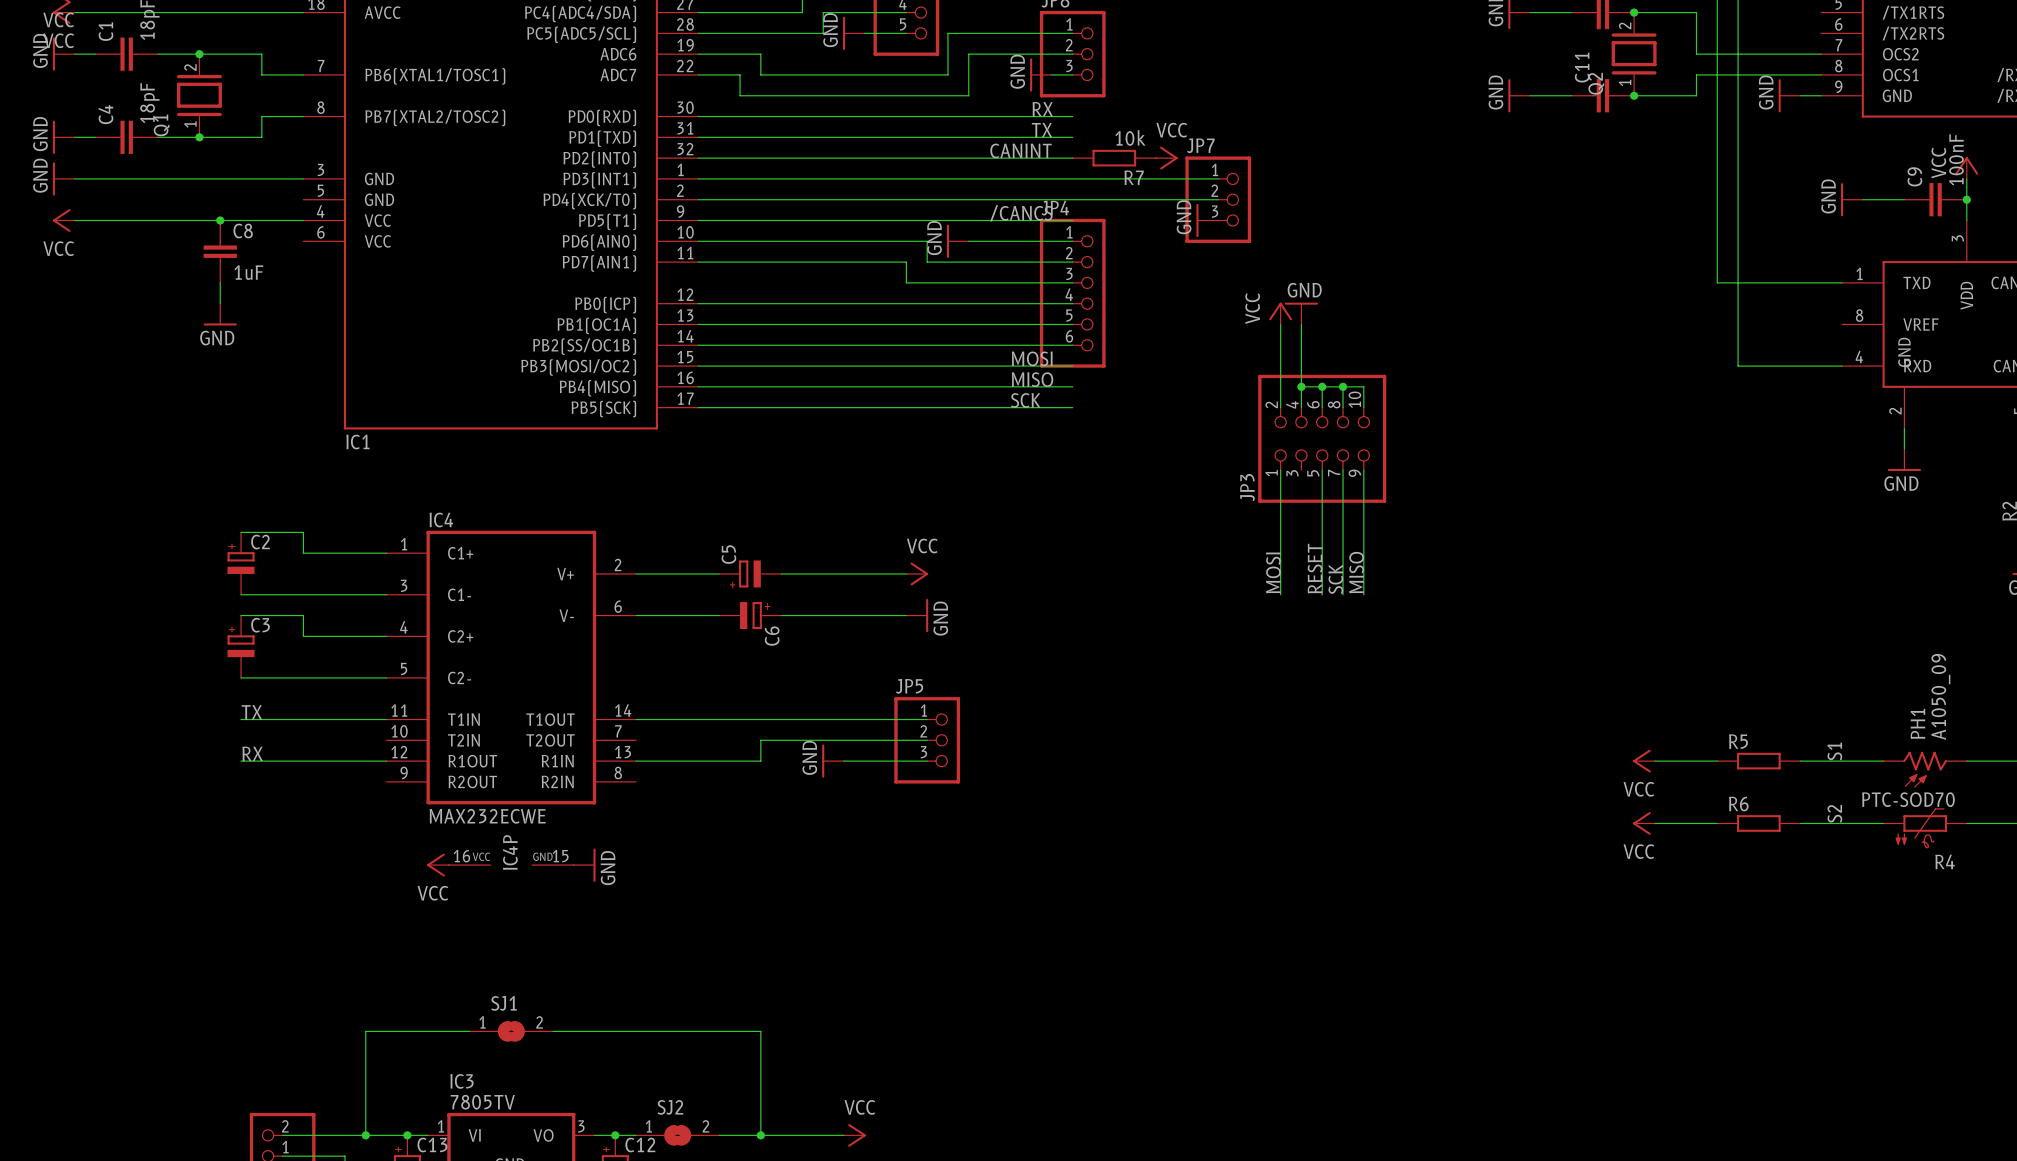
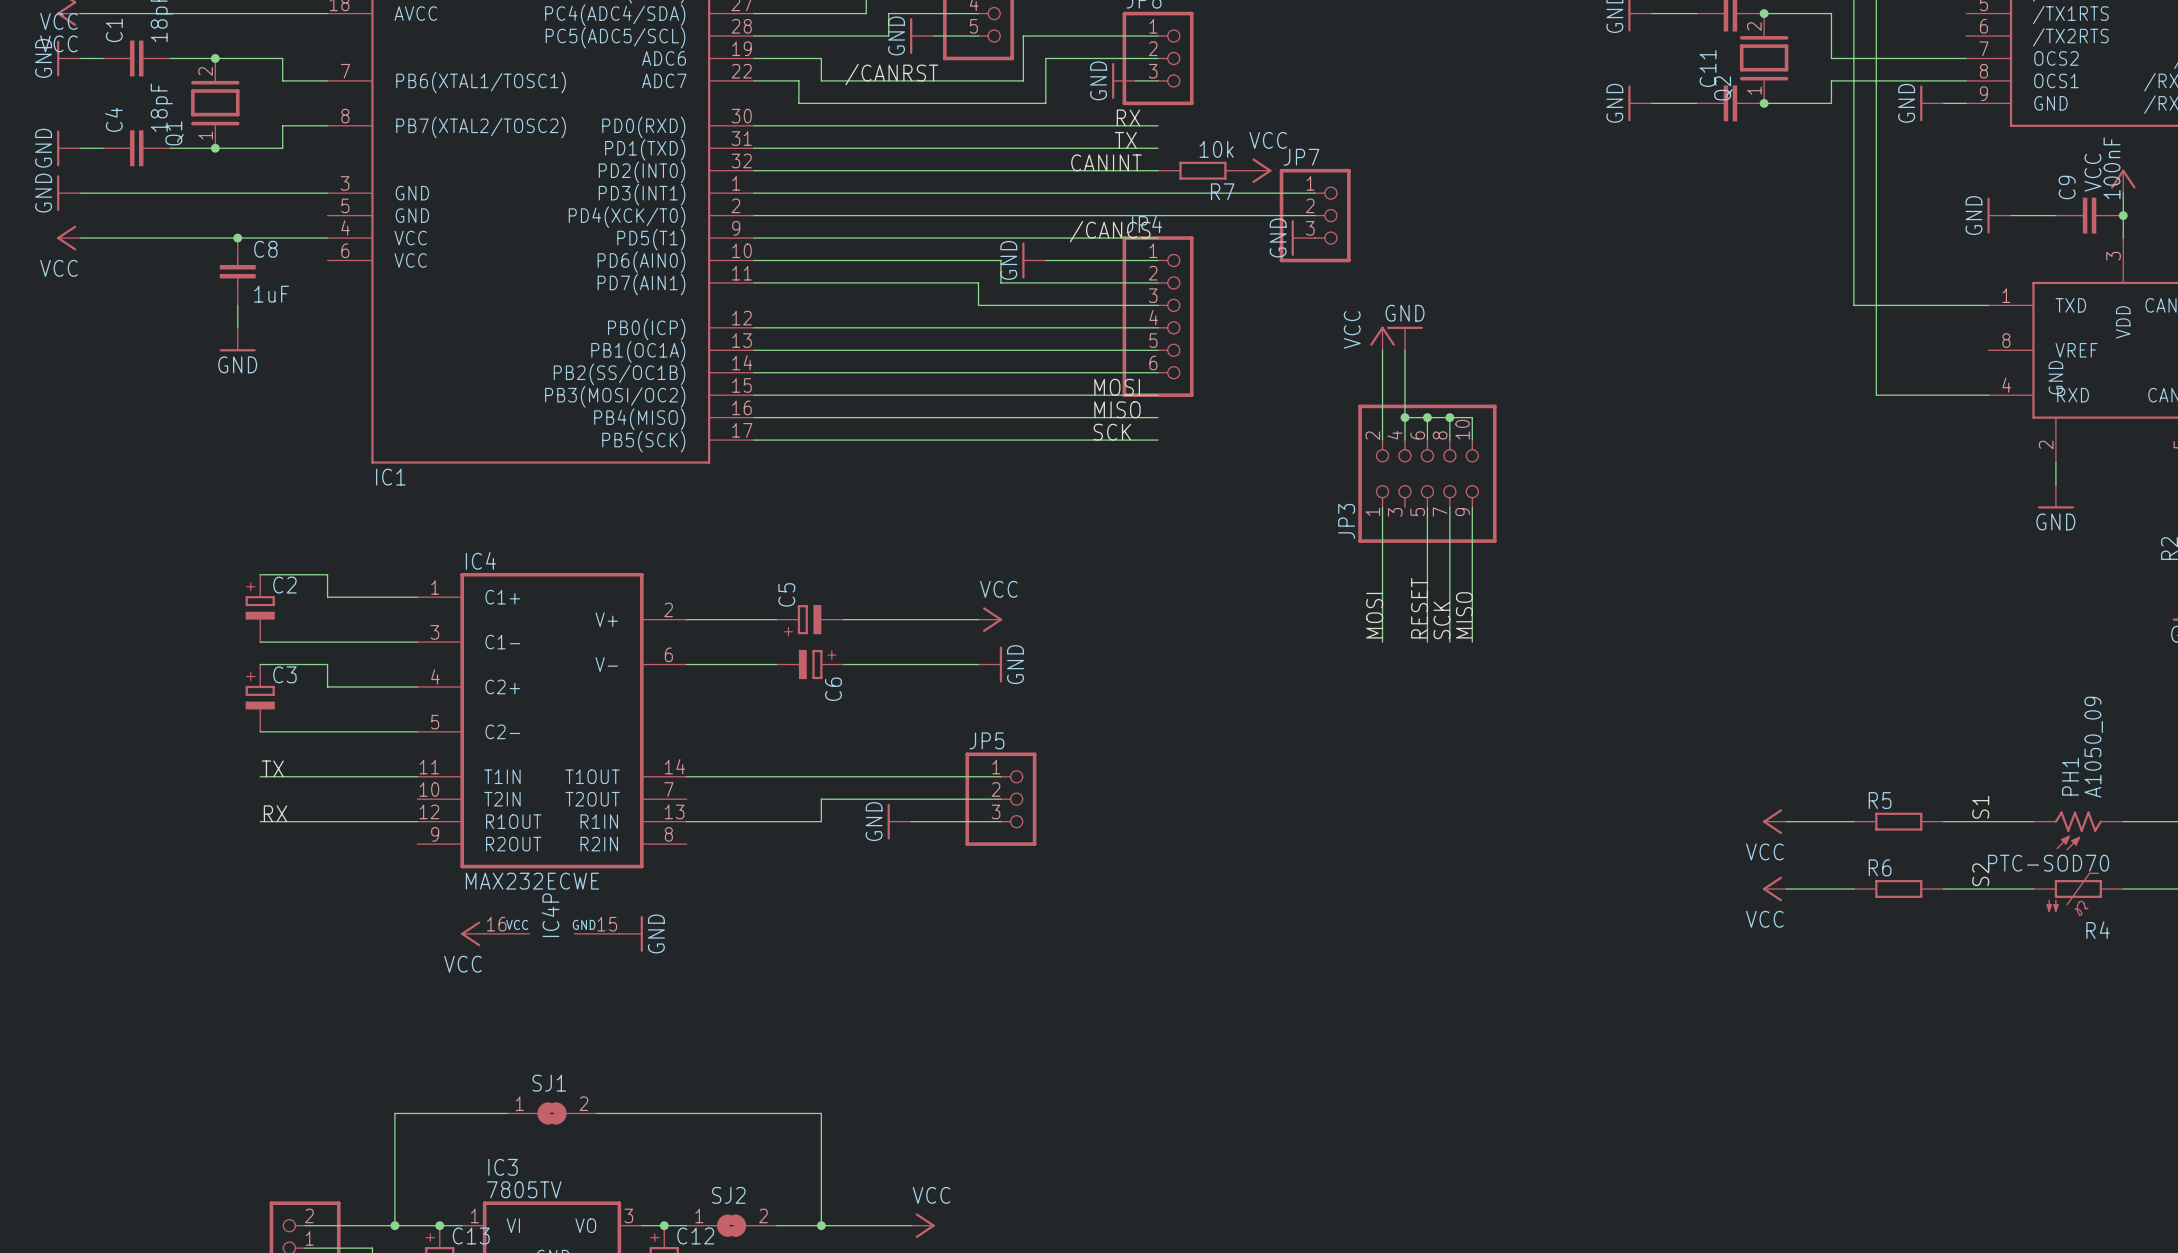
label: none -> /CANRST (891, 74)

